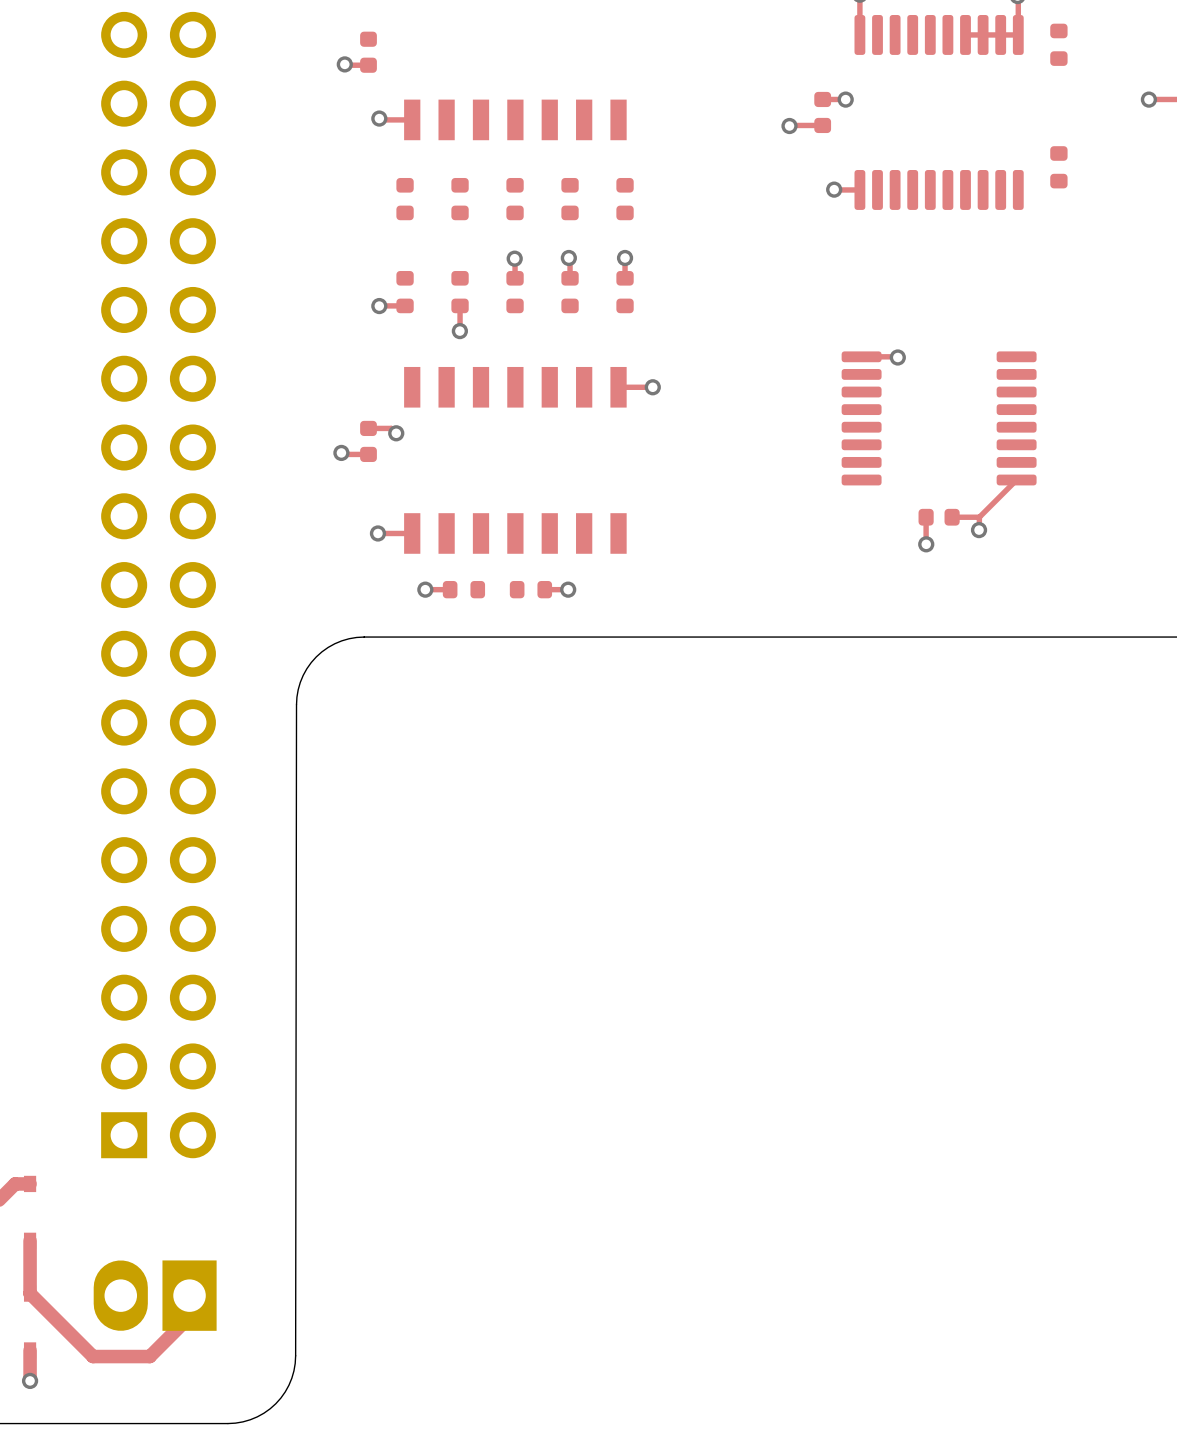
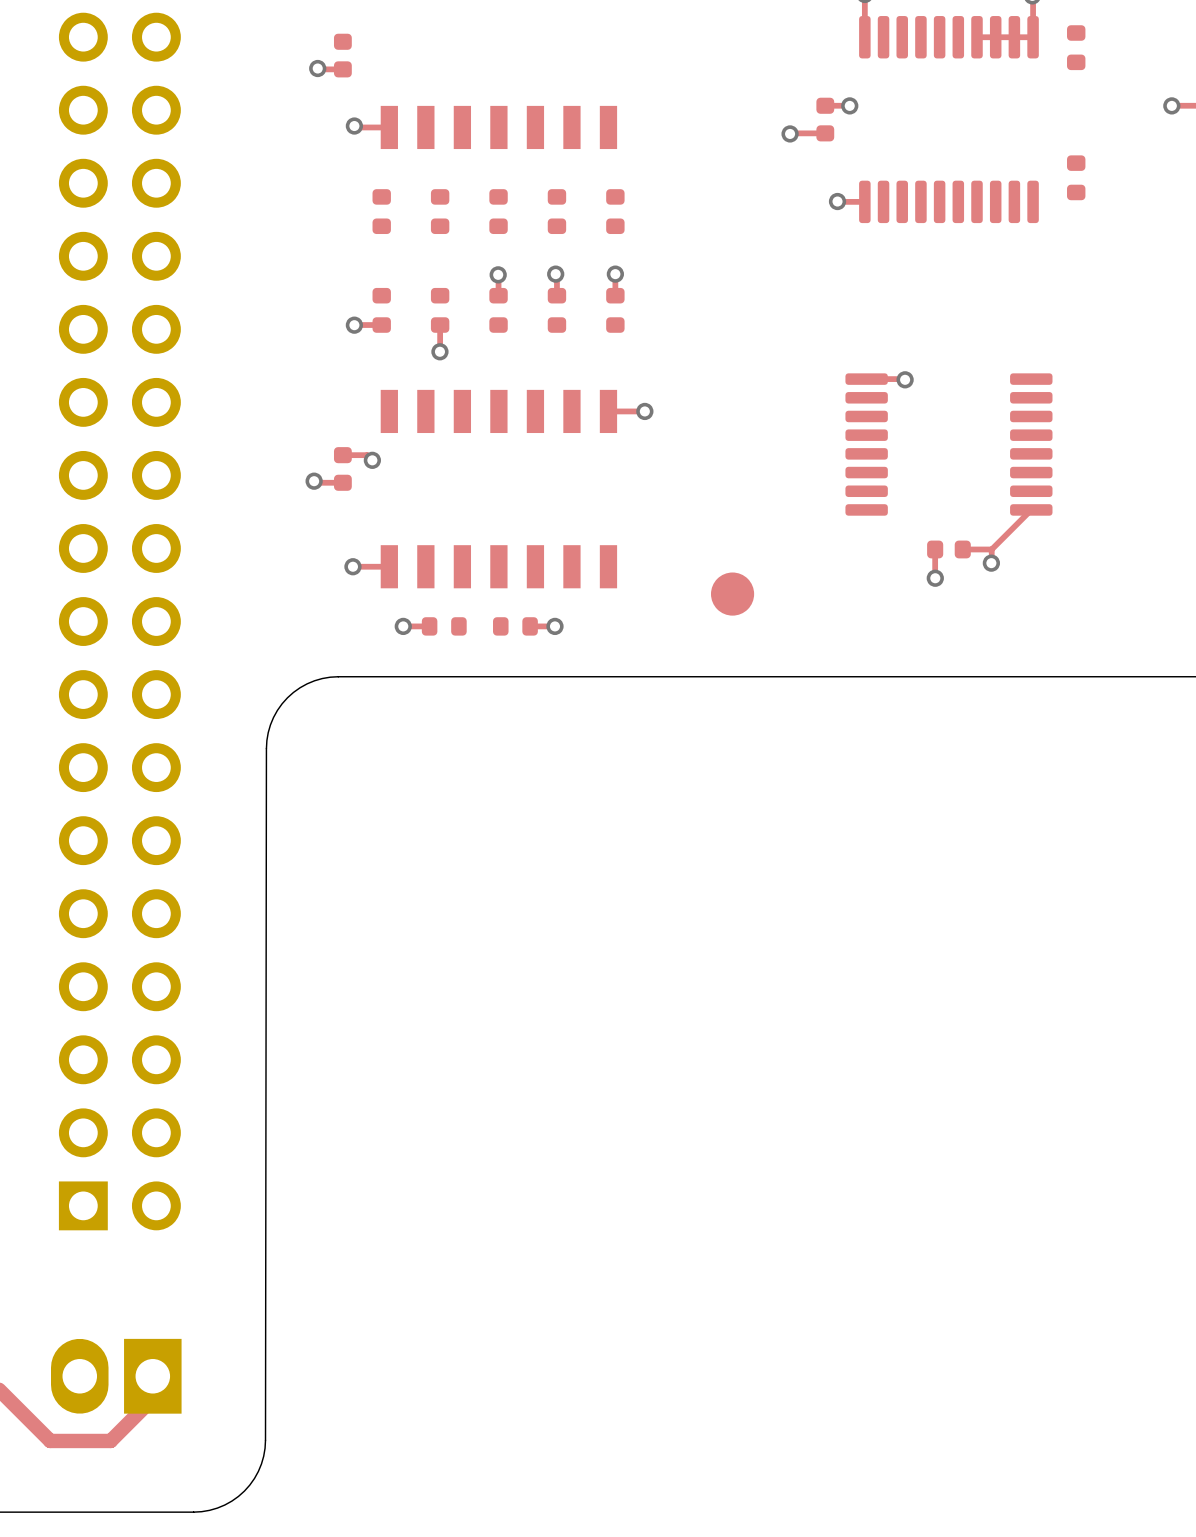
part: none -> (732, 594)

